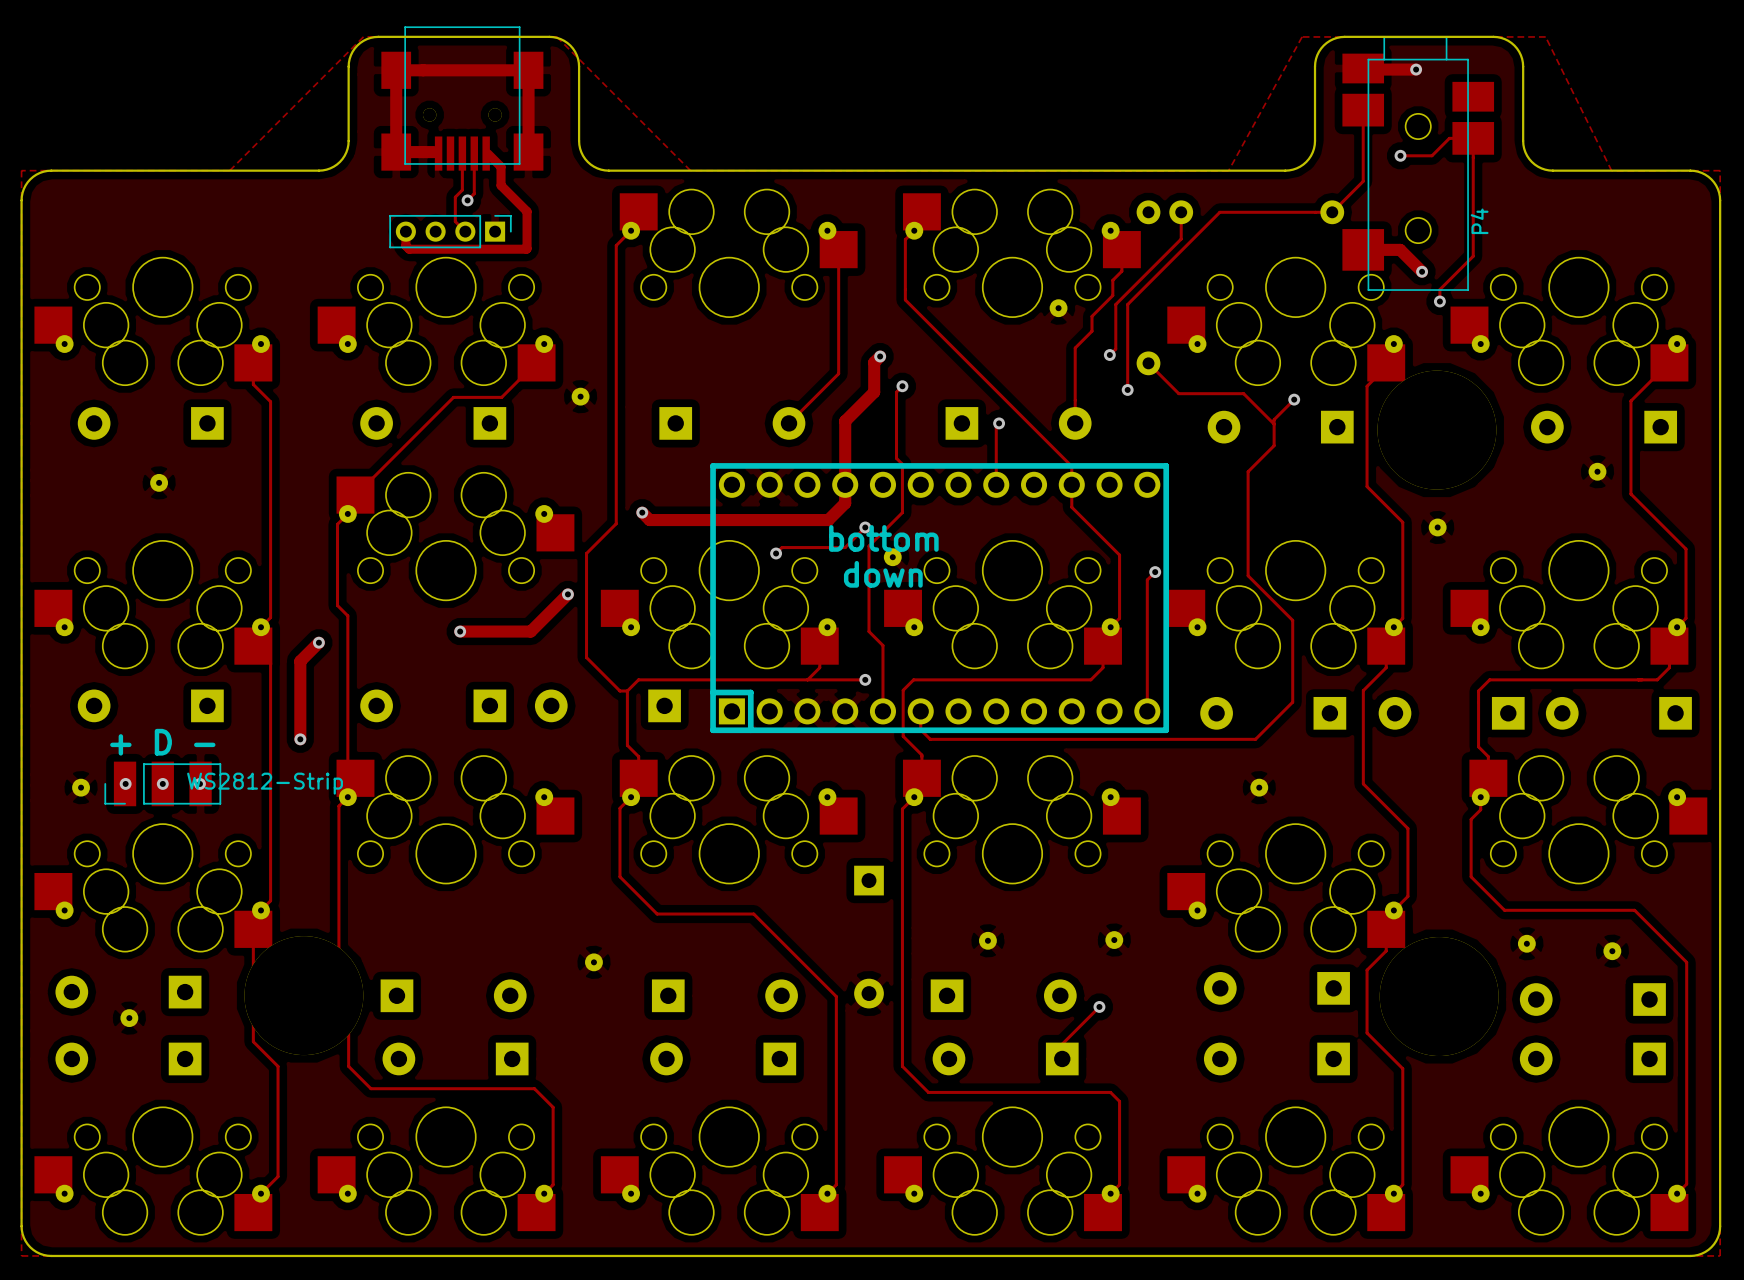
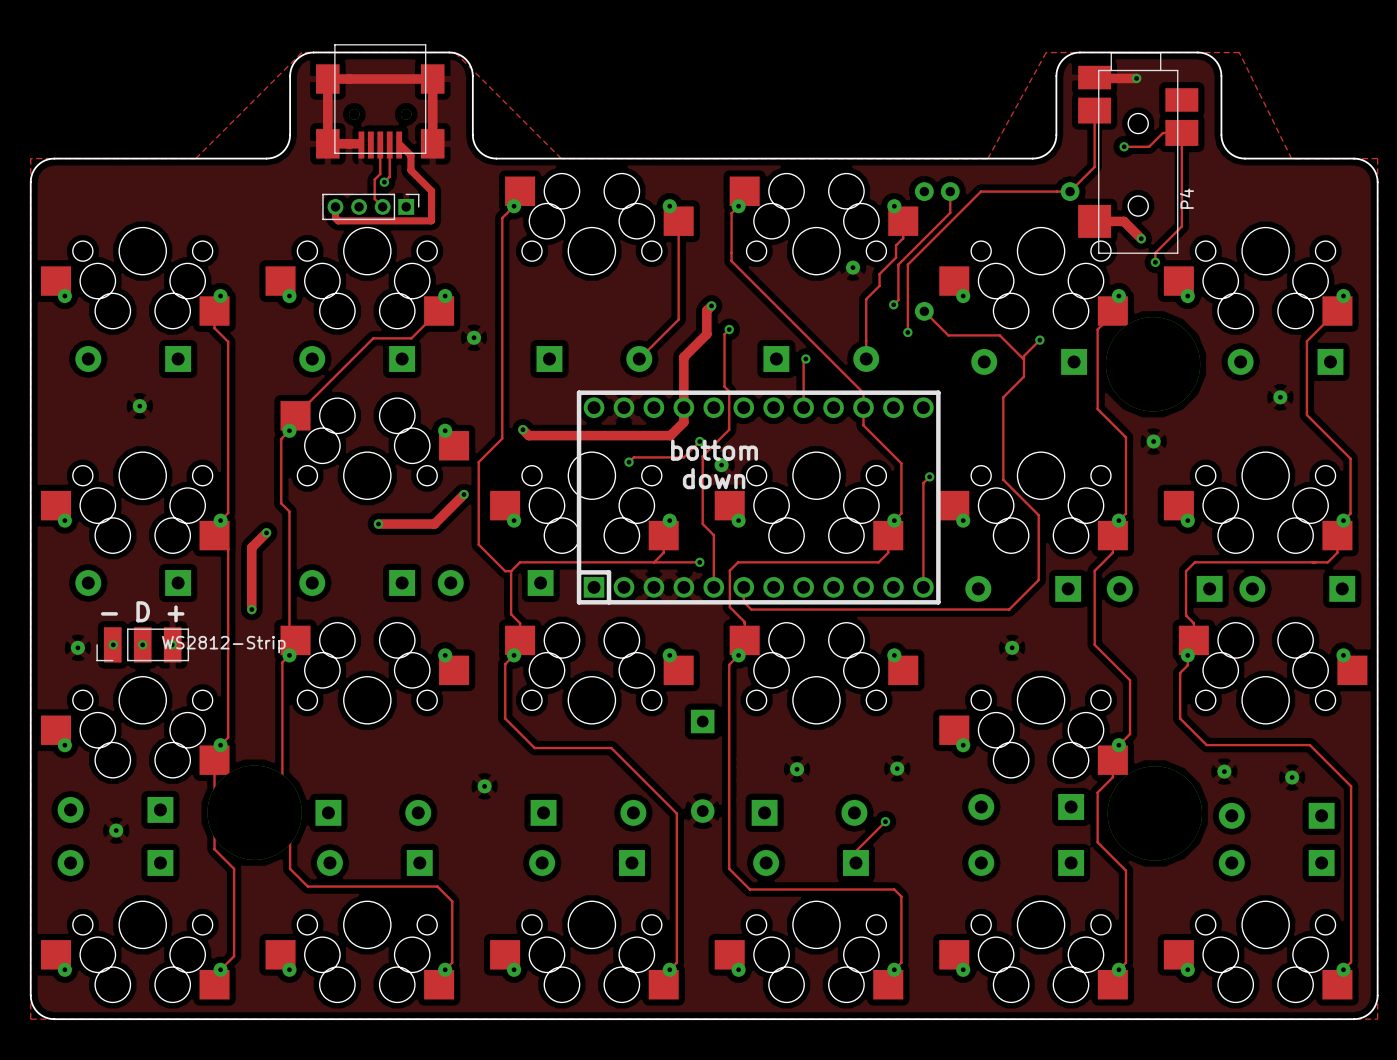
text: + D - (162, 742) -> - D + (142, 611)

